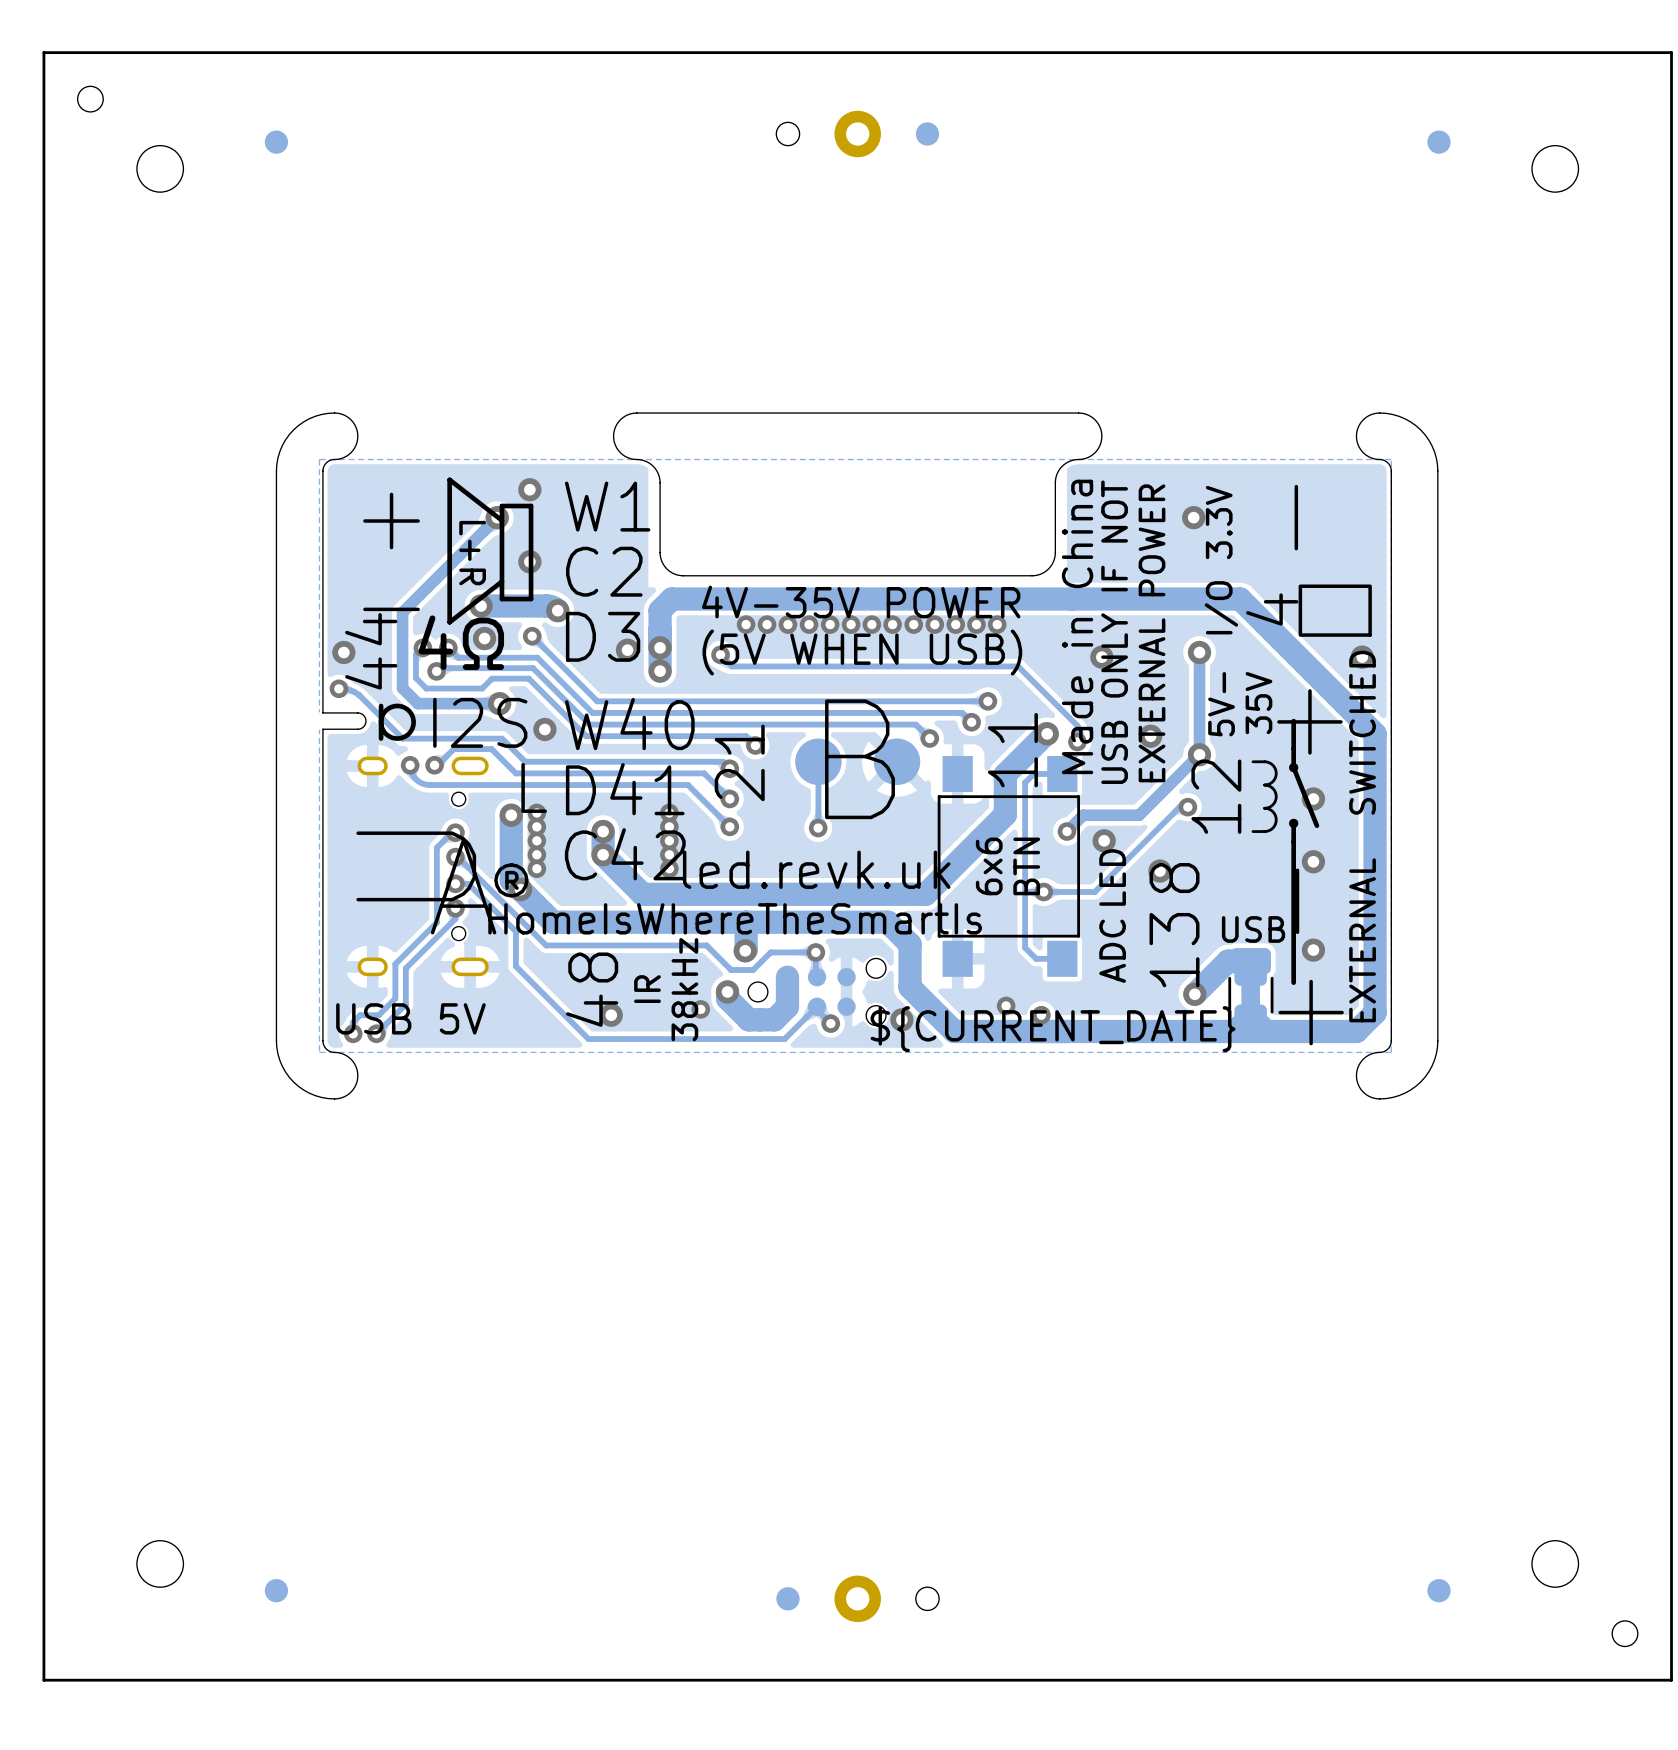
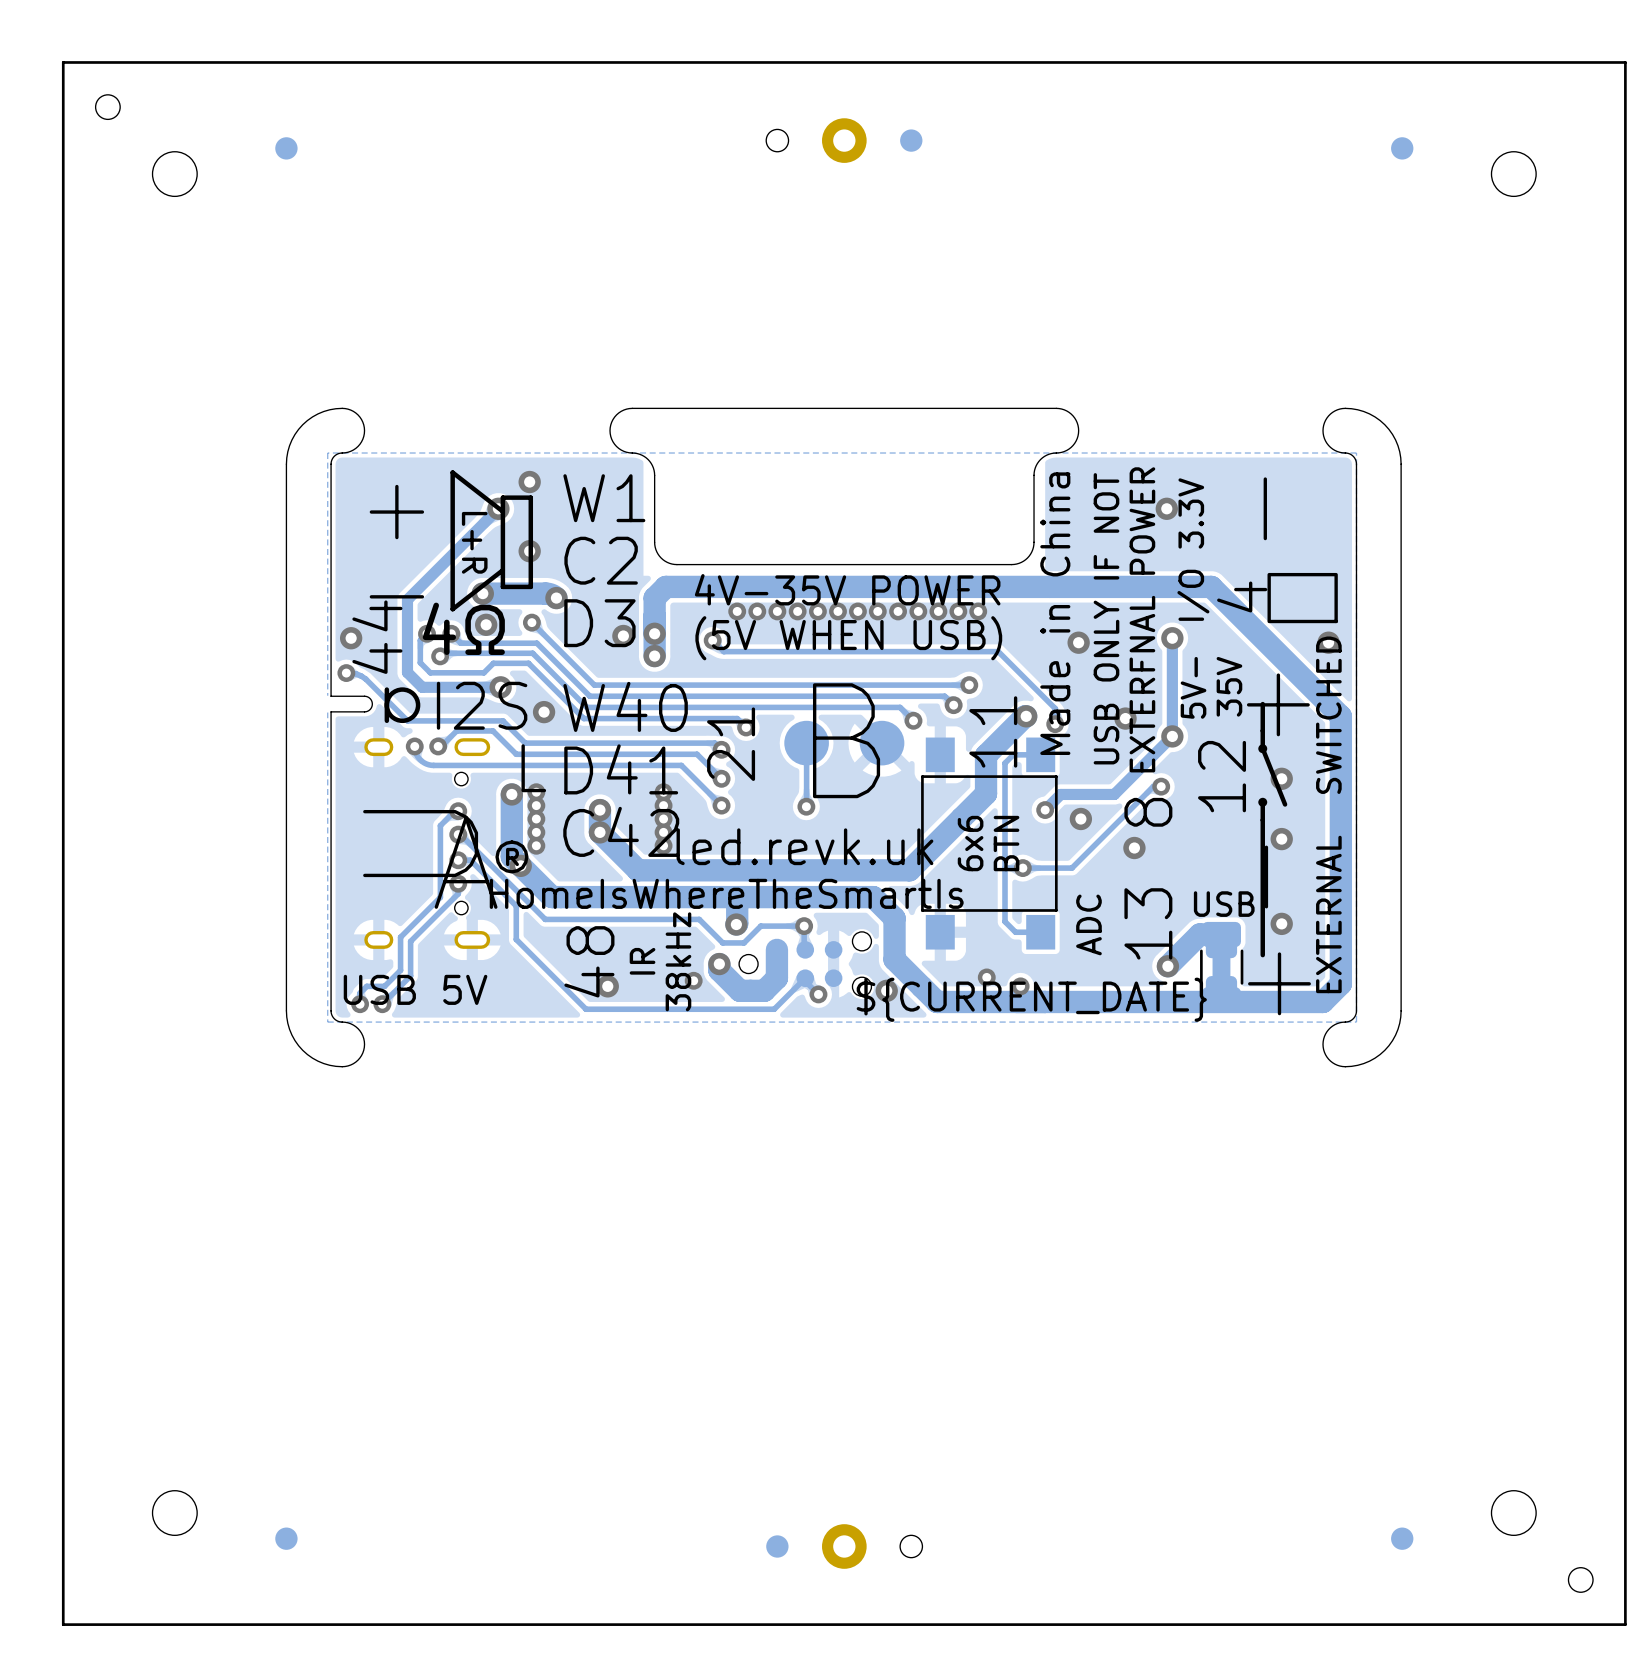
text position: USB ONLY IF NOT (1114, 632) -> USB ONLY IF NOT (1106, 618)
text: EXTERNAL POWER (1152, 633) -> EXTERFNAL POWER (1142, 619)
line: (1252, 761) (1270, 763) (1274, 767) (1276, 773) (1272, 781) (1264, 785) (1271, 787) (1275, 793) (1273, 803) (1264, 808) (1273, 812) (1276, 818) (1275, 824) (1267, 831) (1252, 831) -> none
text position: 12 (1216, 796) -> 12 (1222, 776)
text: LED (1112, 877) -> none
text position: 8 (1174, 878) -> 8 (1148, 812)

